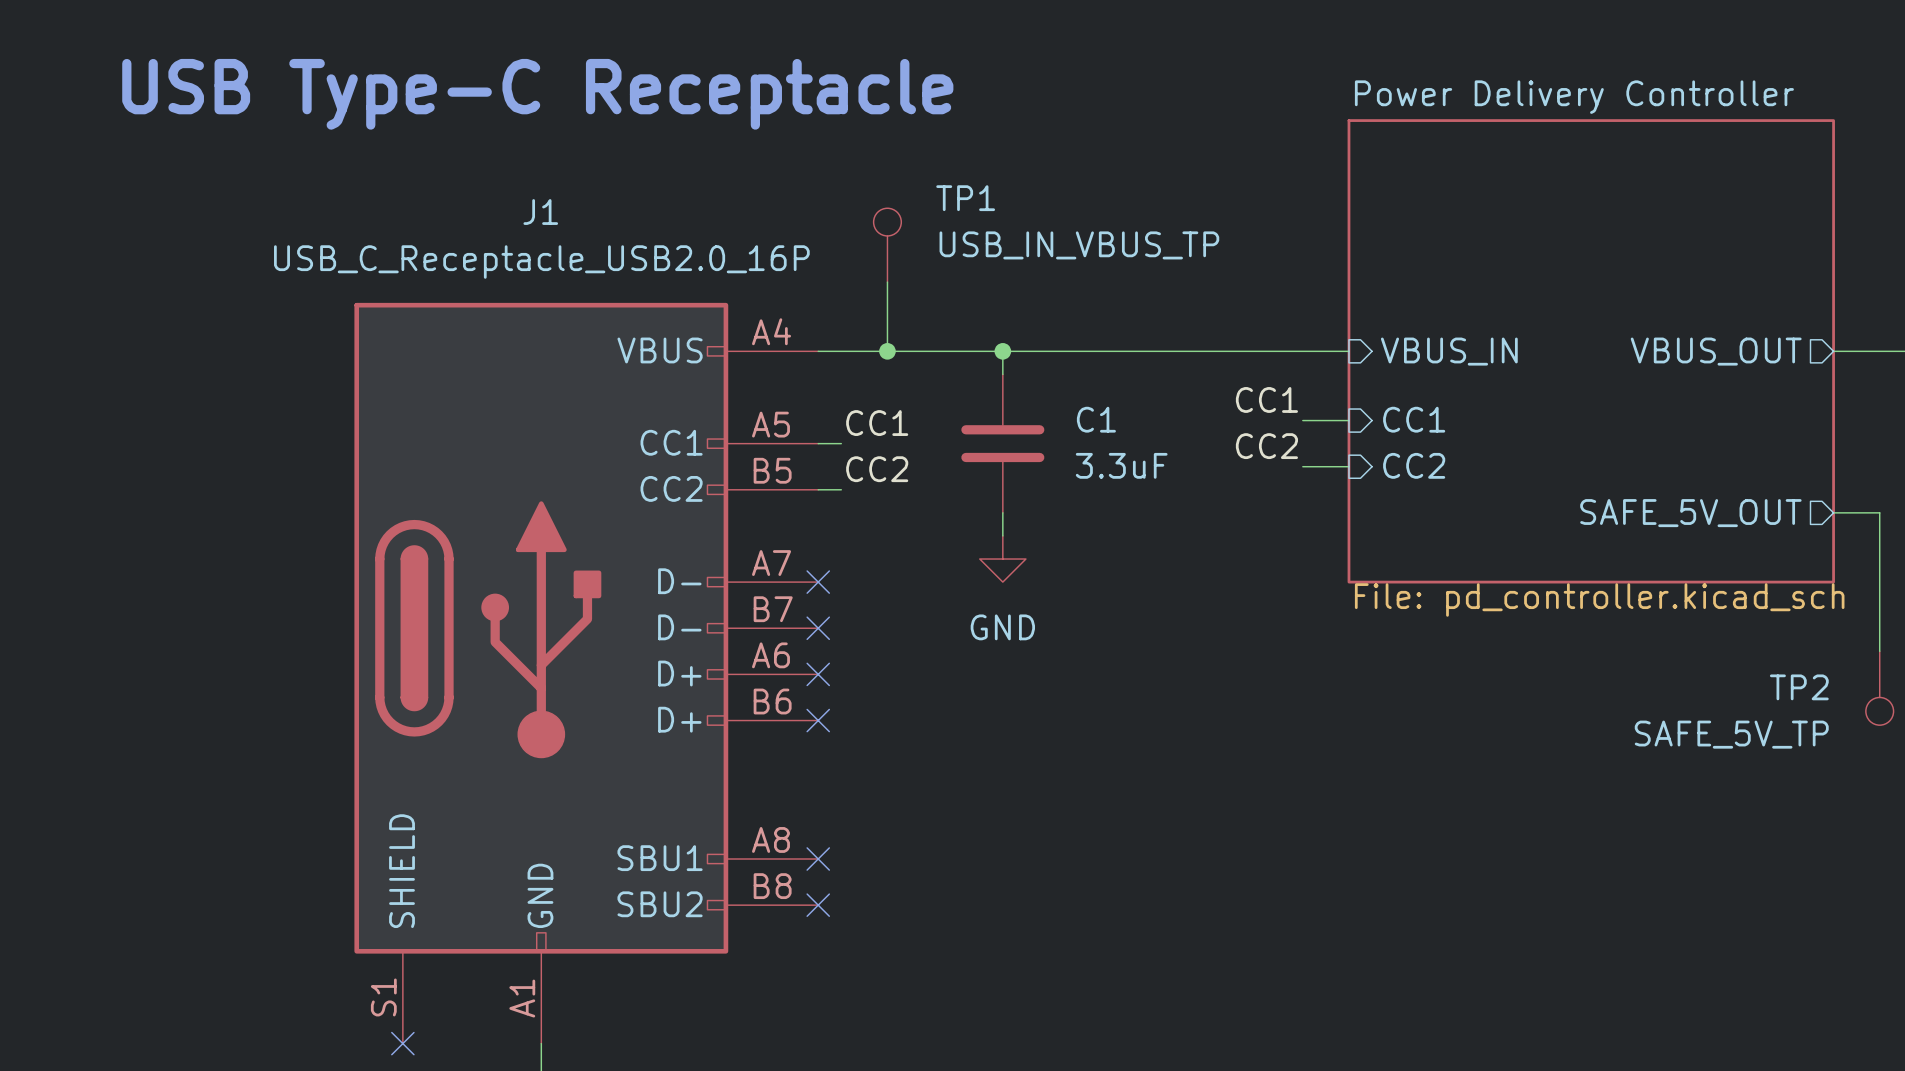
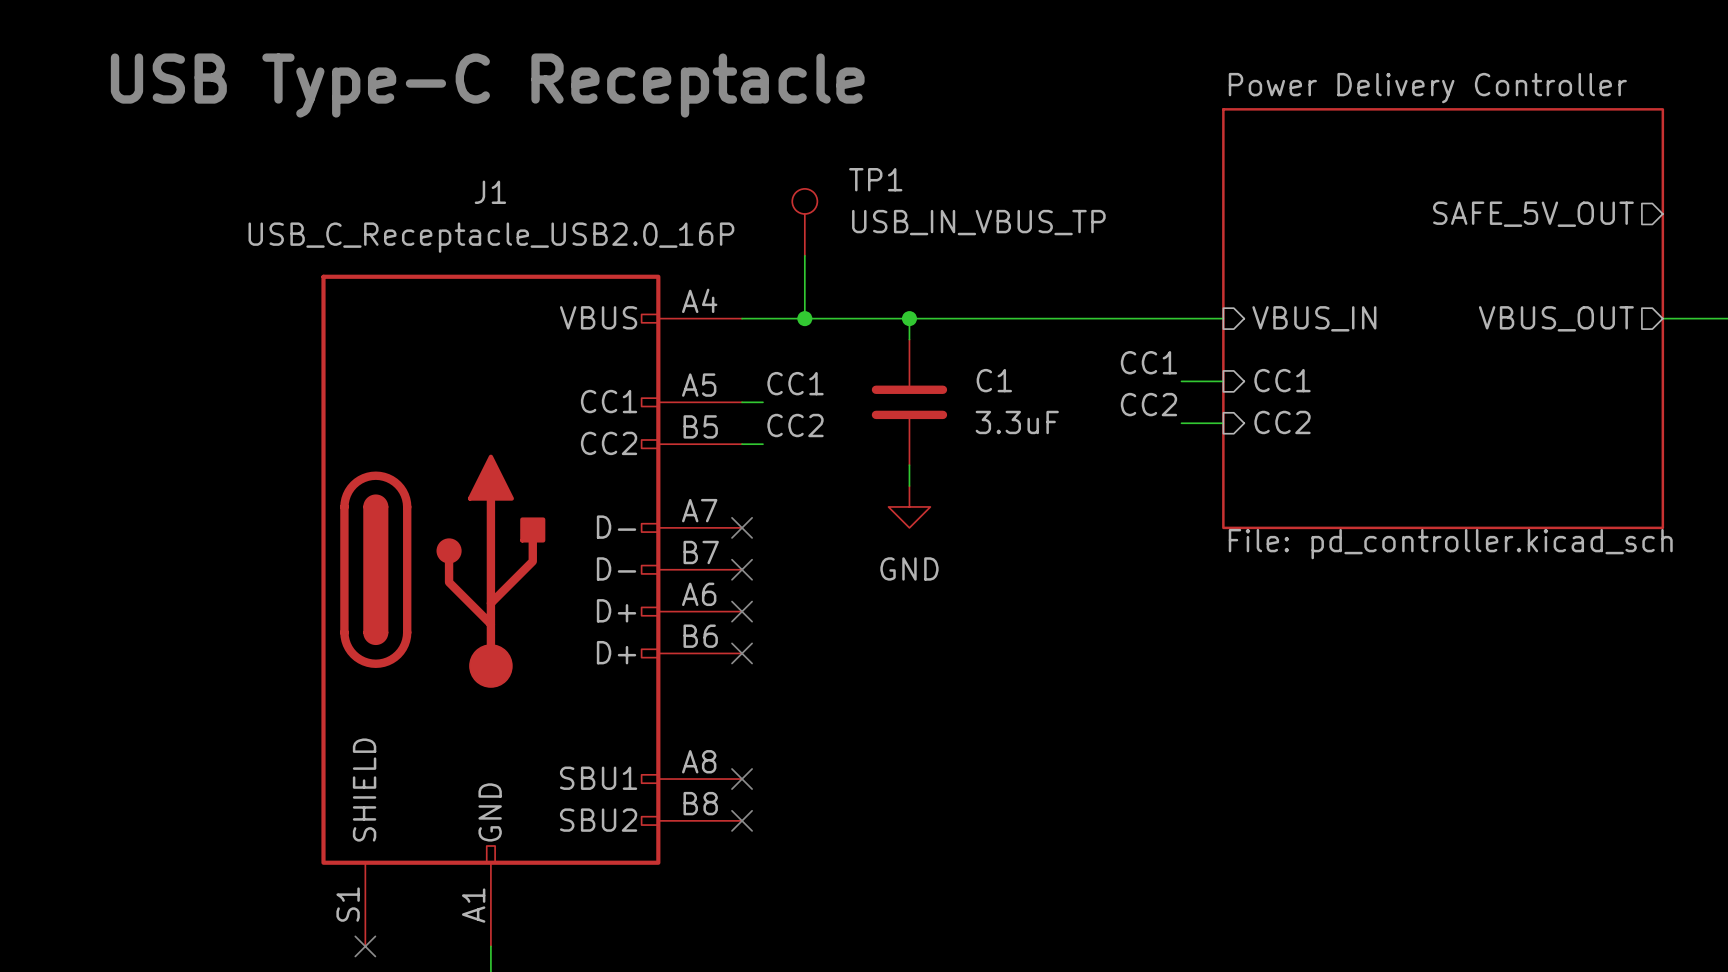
wire: (1833, 512) (1879, 512) (1879, 651) -> none
sheet pin position: SAFE_5V_OUT (1690, 513) -> SAFE_5V_OUT (1533, 214)
TP2: SAFE_5V_TP (1879, 688) -> none

